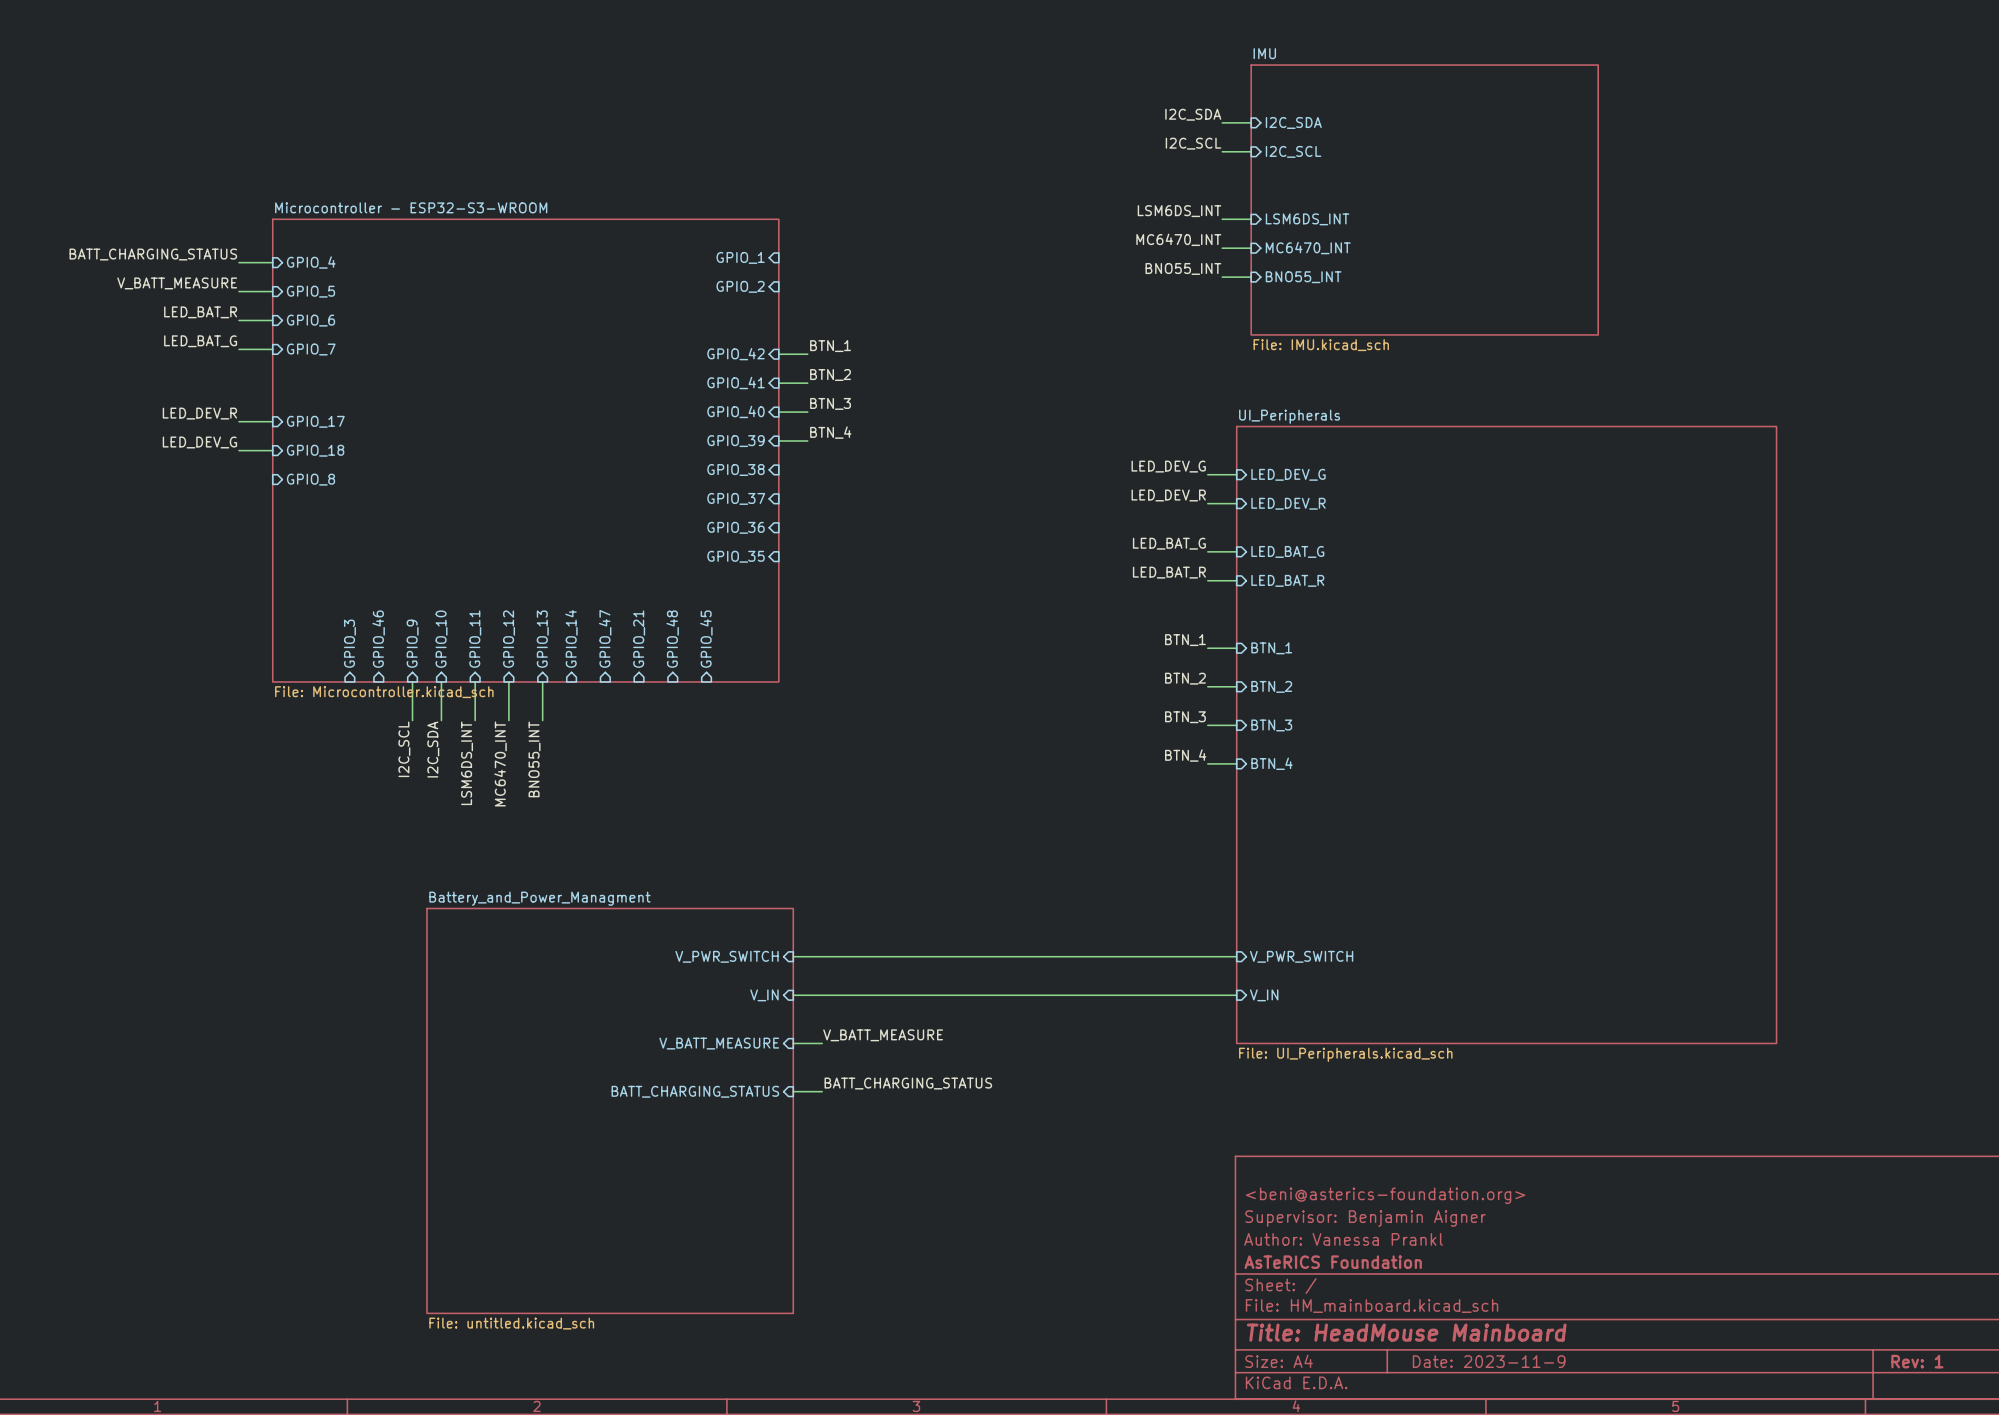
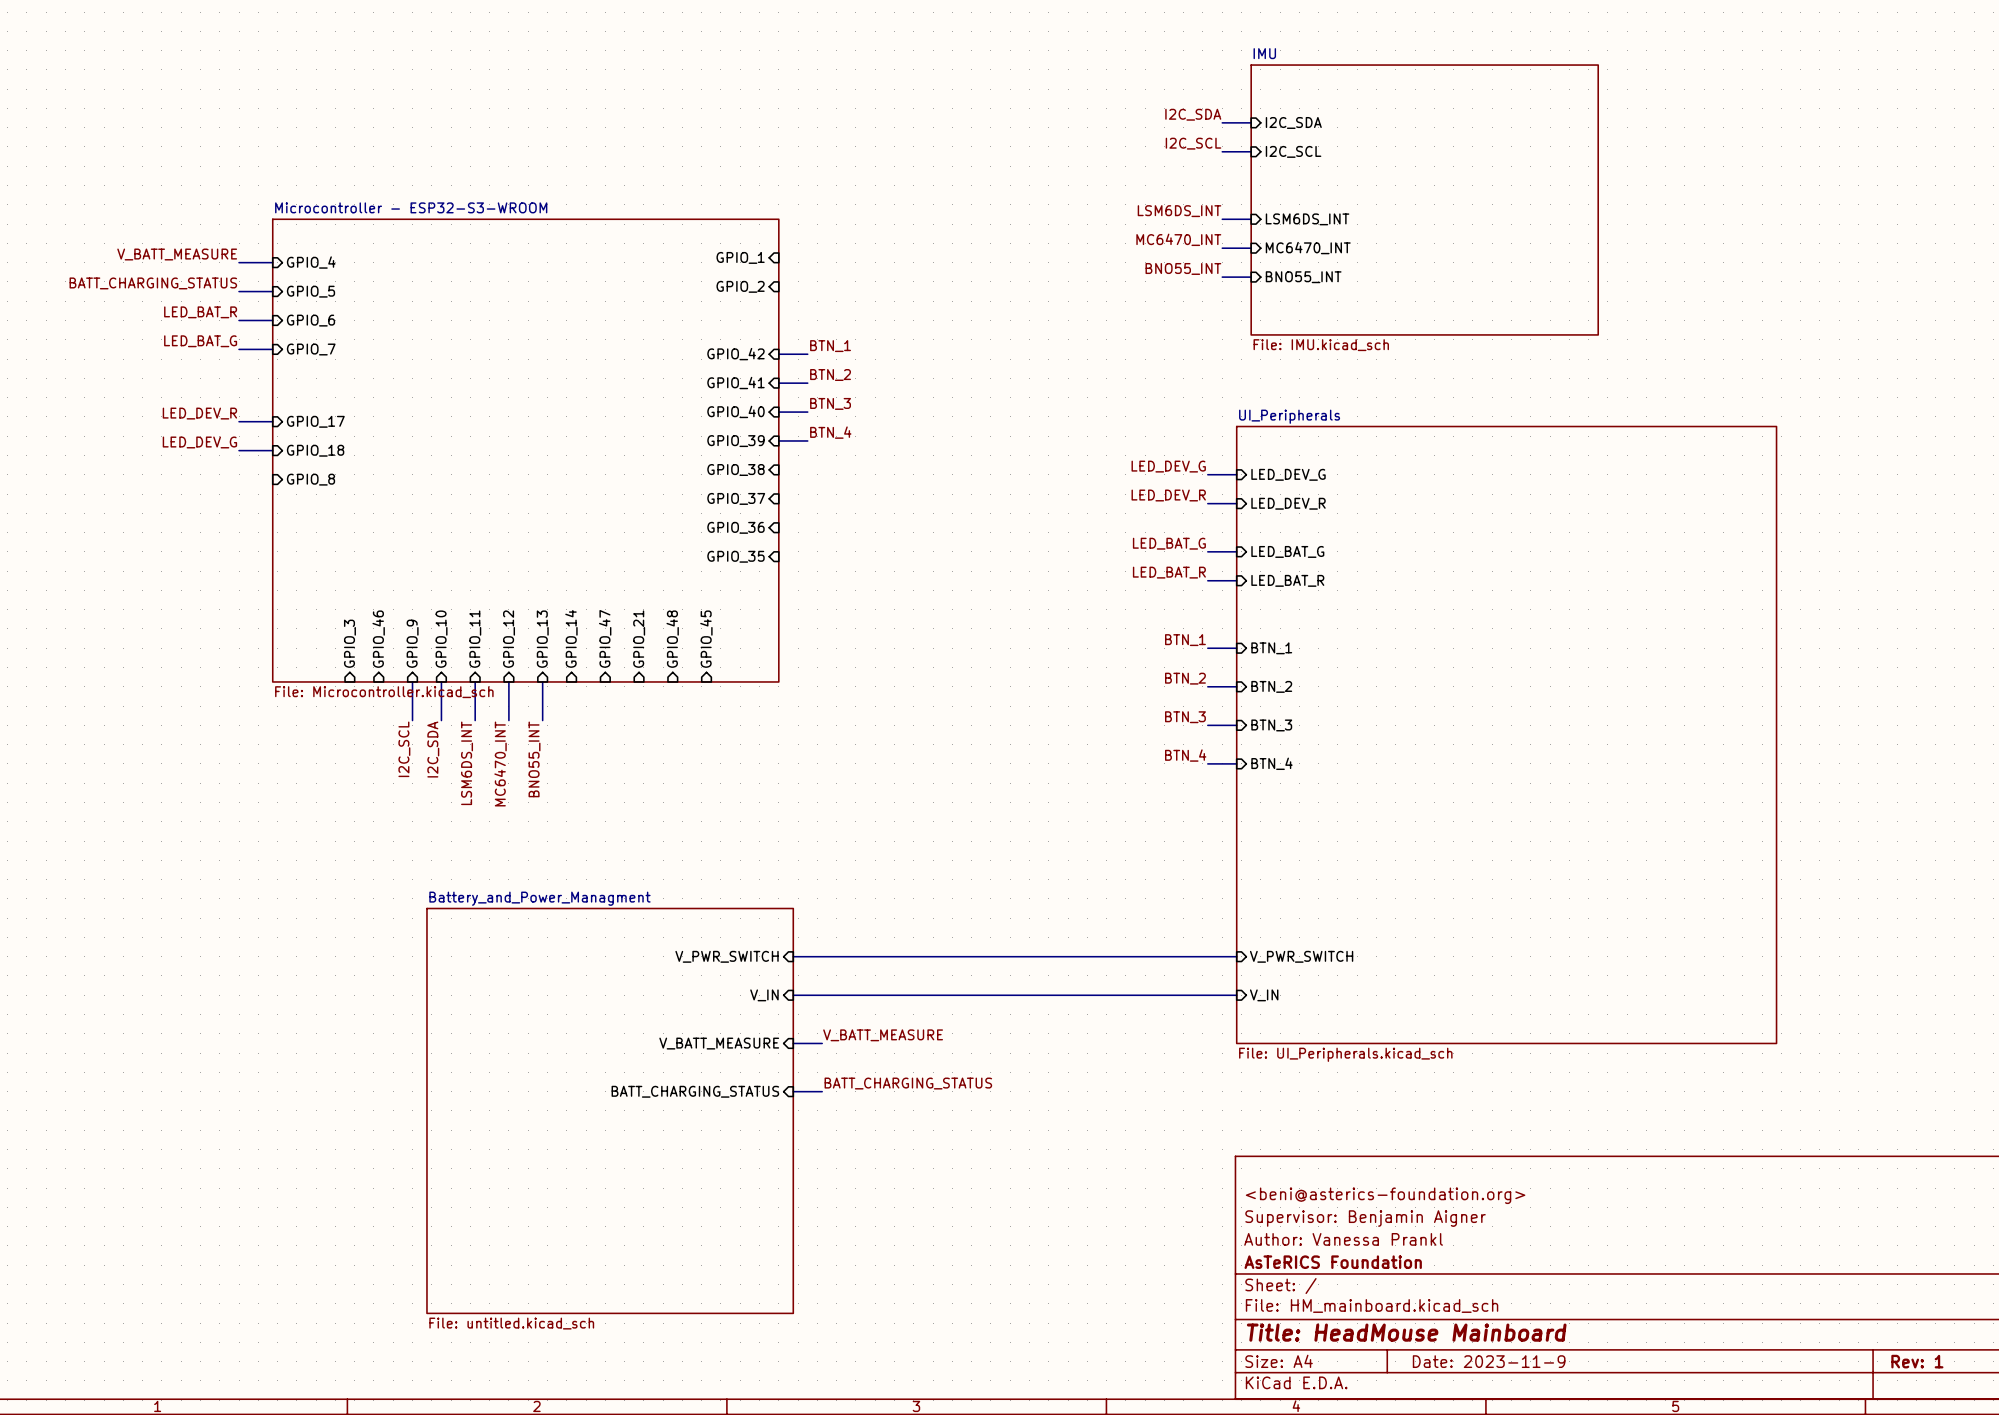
label: BATT_CHARGING_STATUS (153, 254) -> V_BATT_MEASURE (177, 254)
label: V_BATT_MEASURE (177, 283) -> BATT_CHARGING_STATUS (153, 283)

